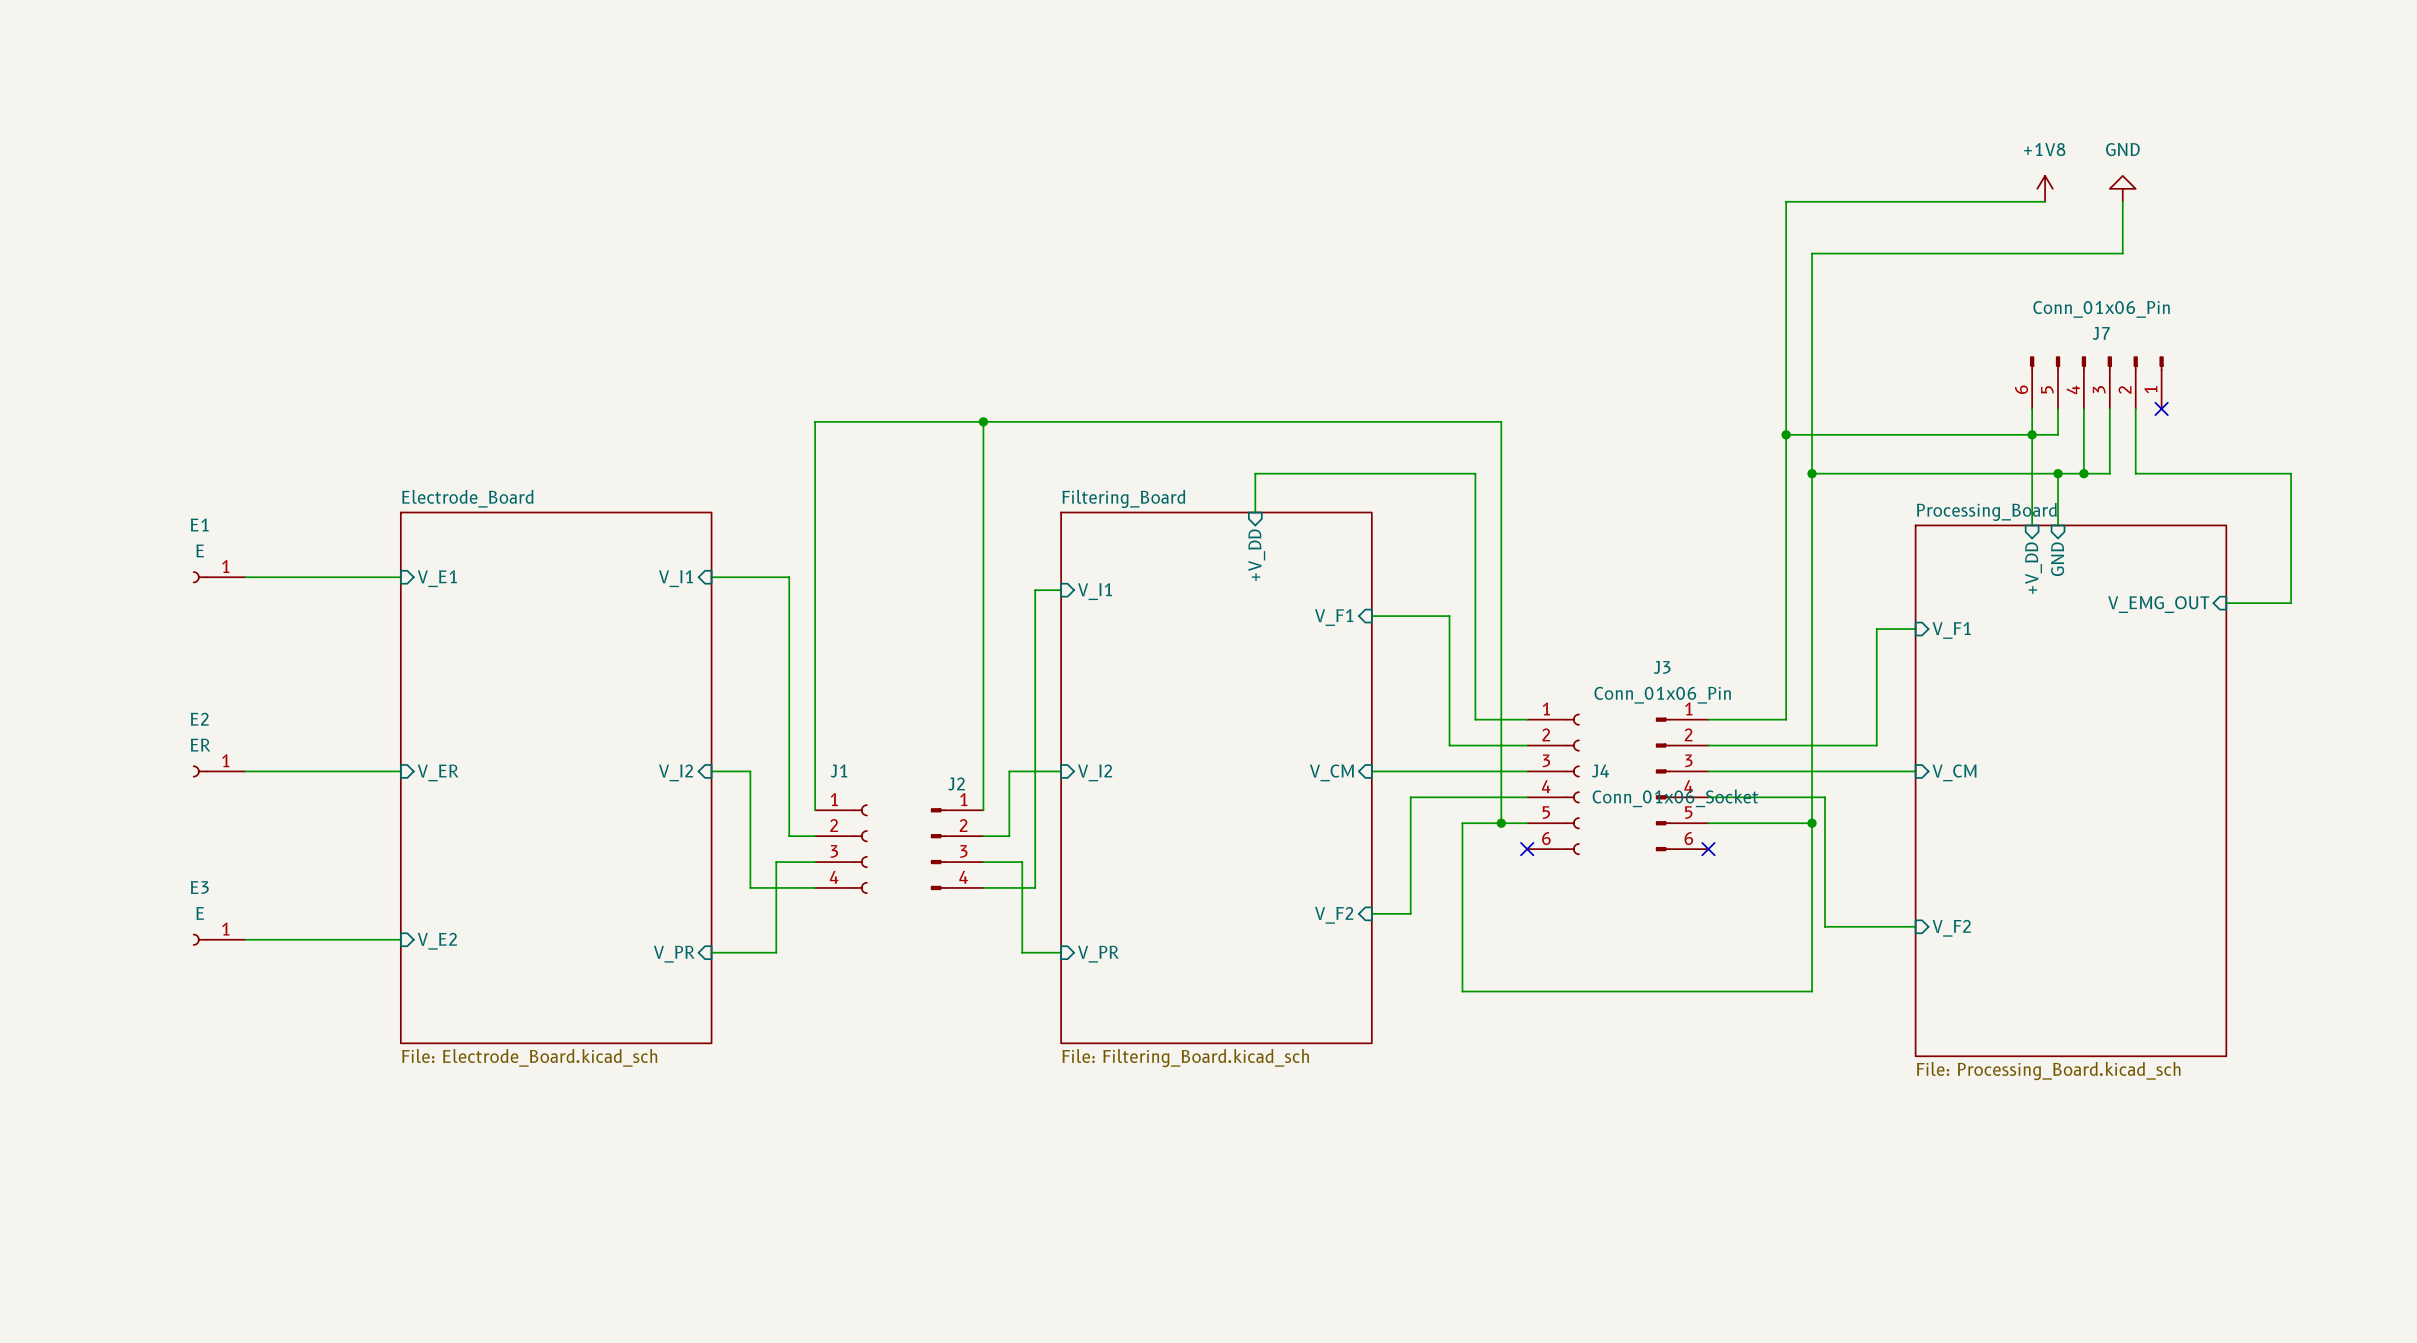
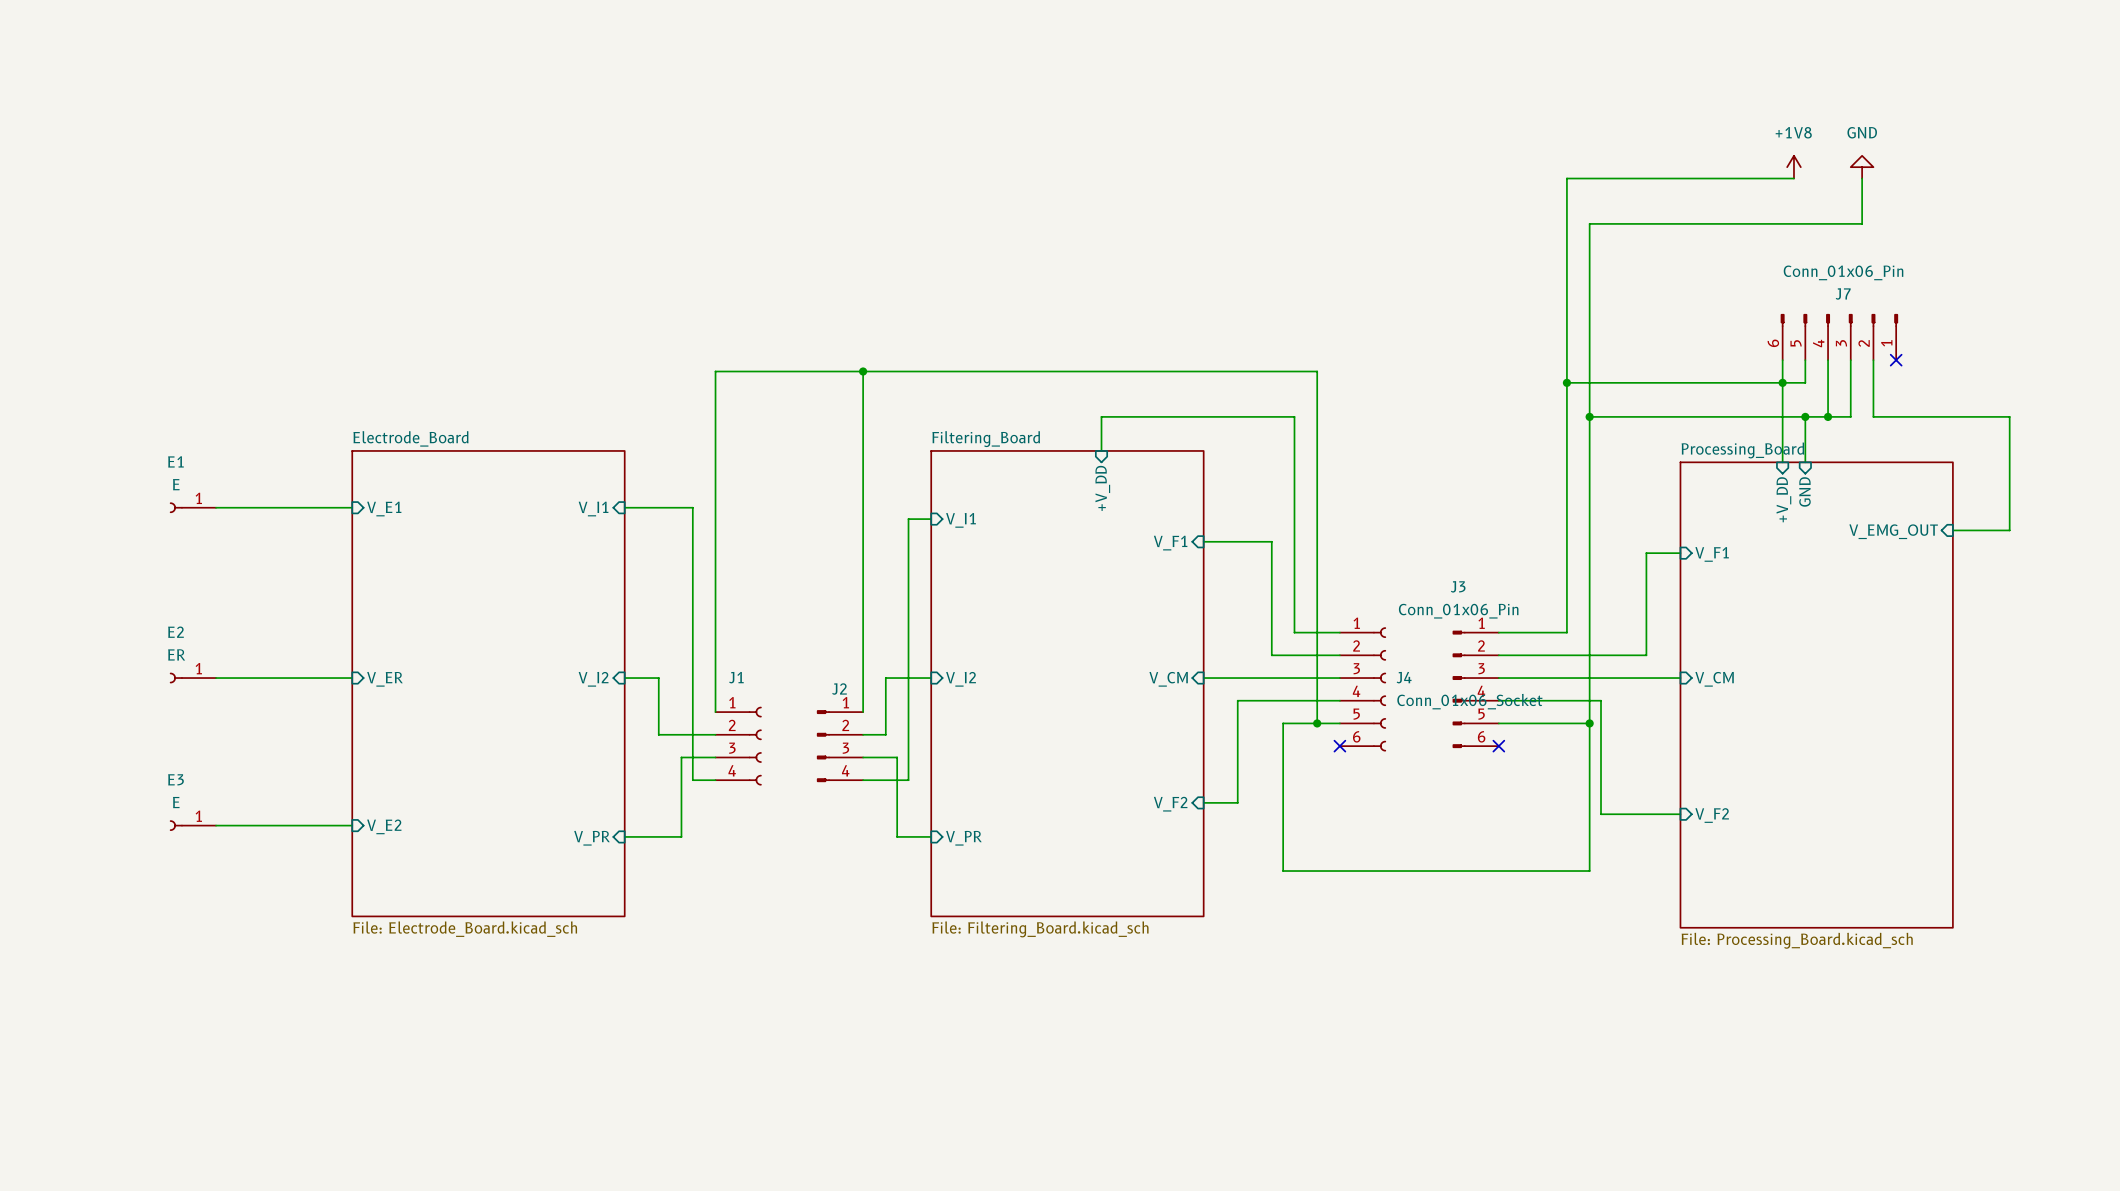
wire: (750, 836) (750, 887) (789, 887) -> (658, 734) (692, 734) (692, 780)

